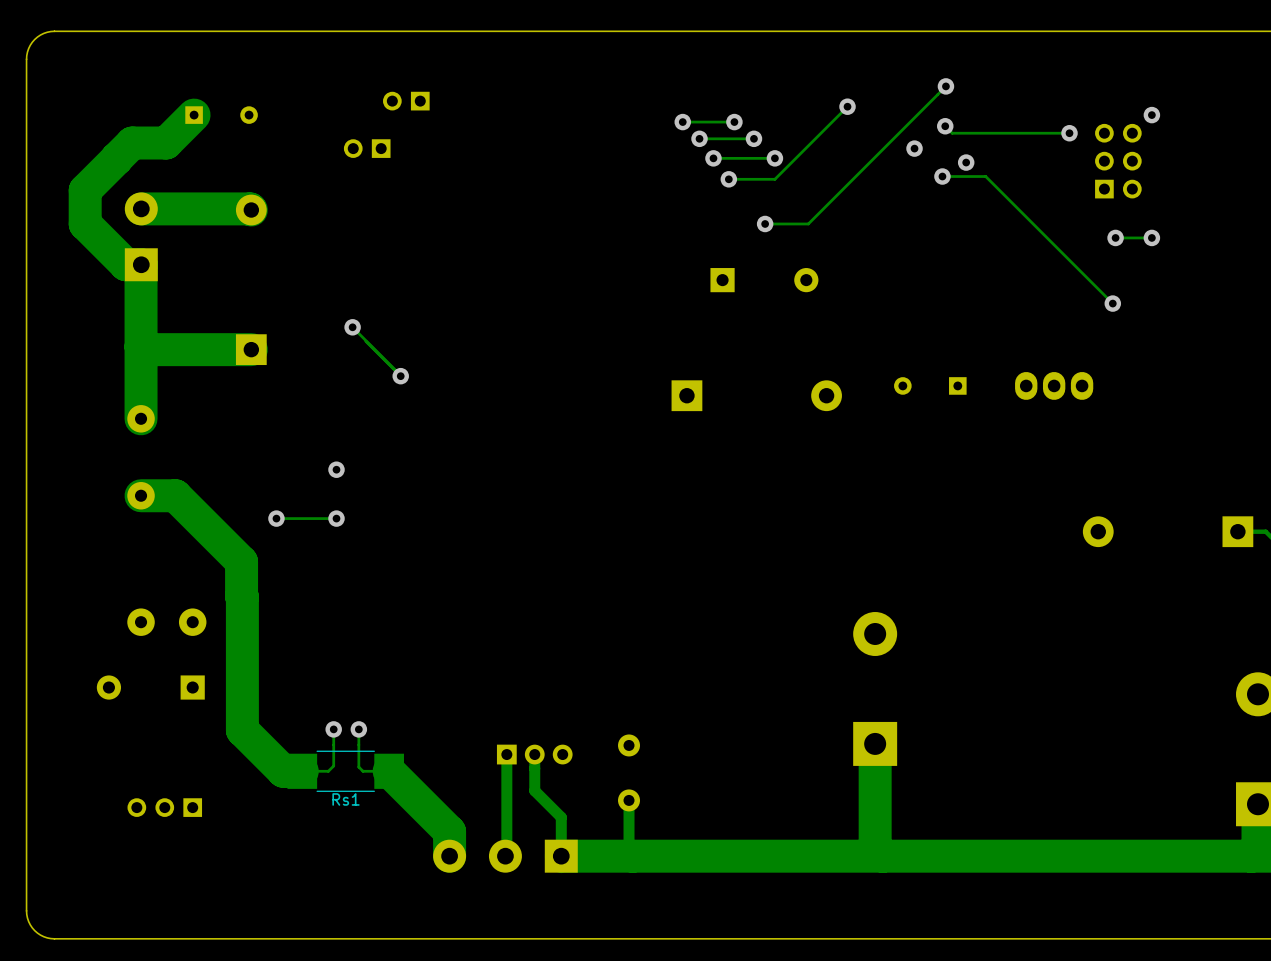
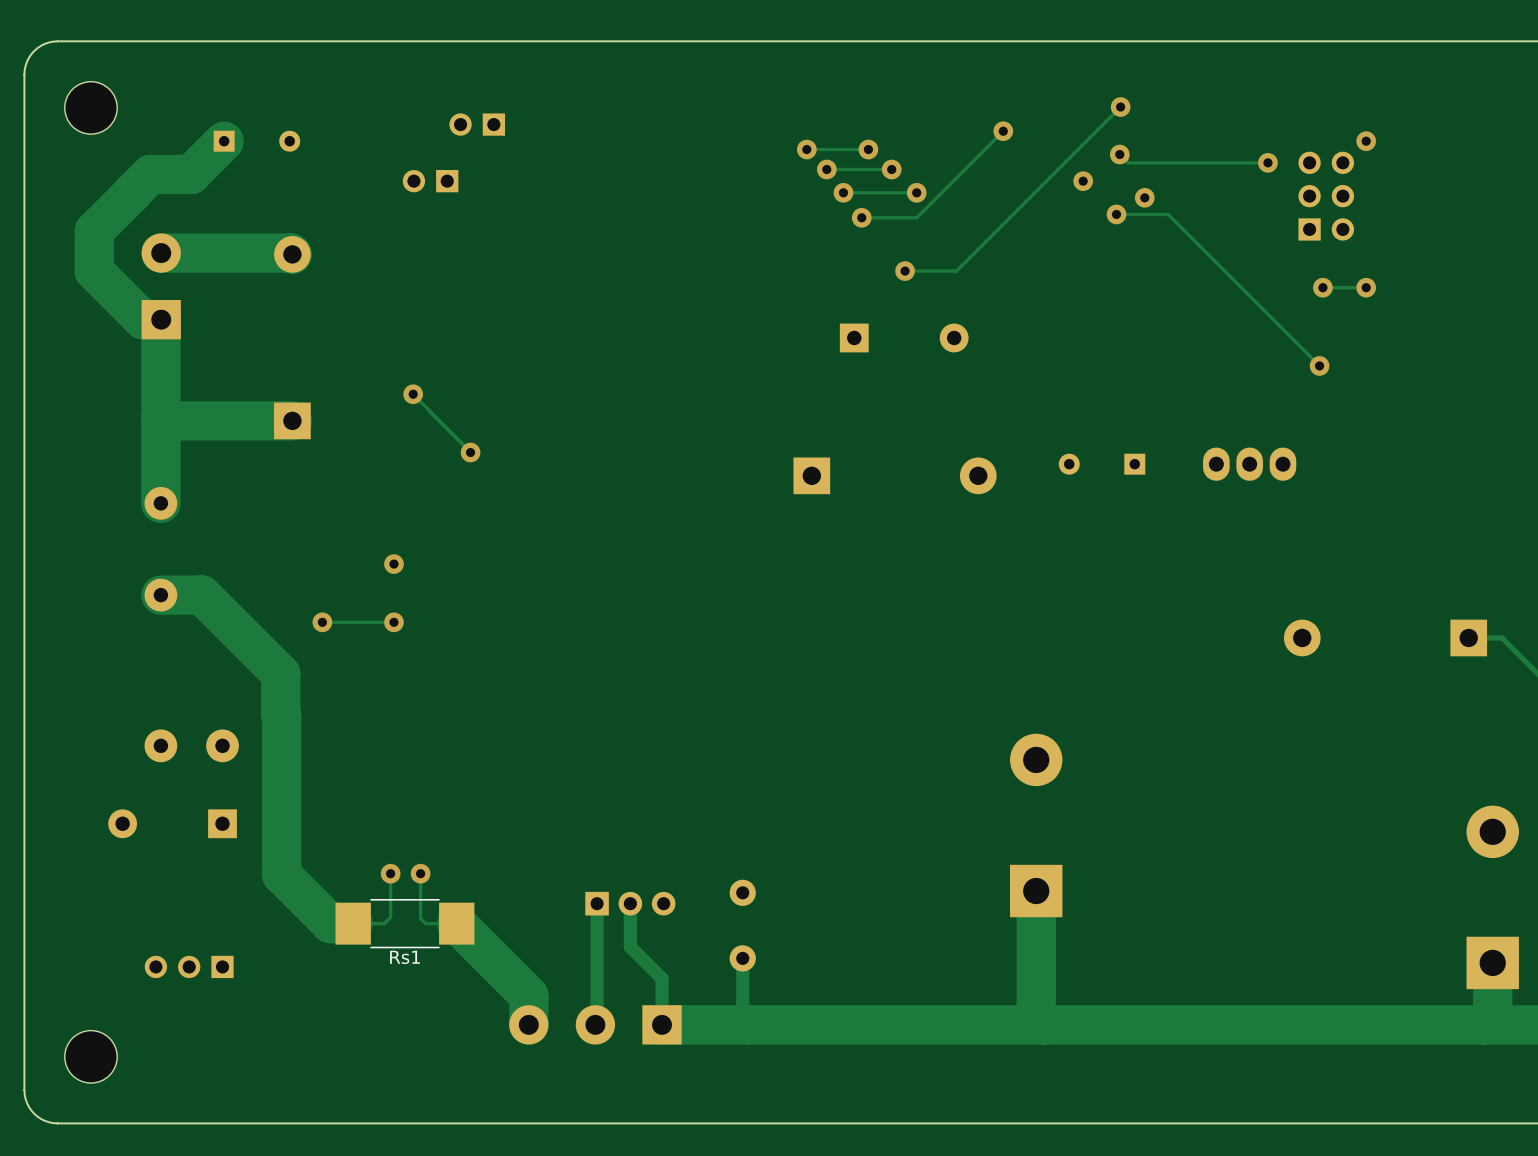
part: none -> (90, 107)
part: none -> (90, 1056)

